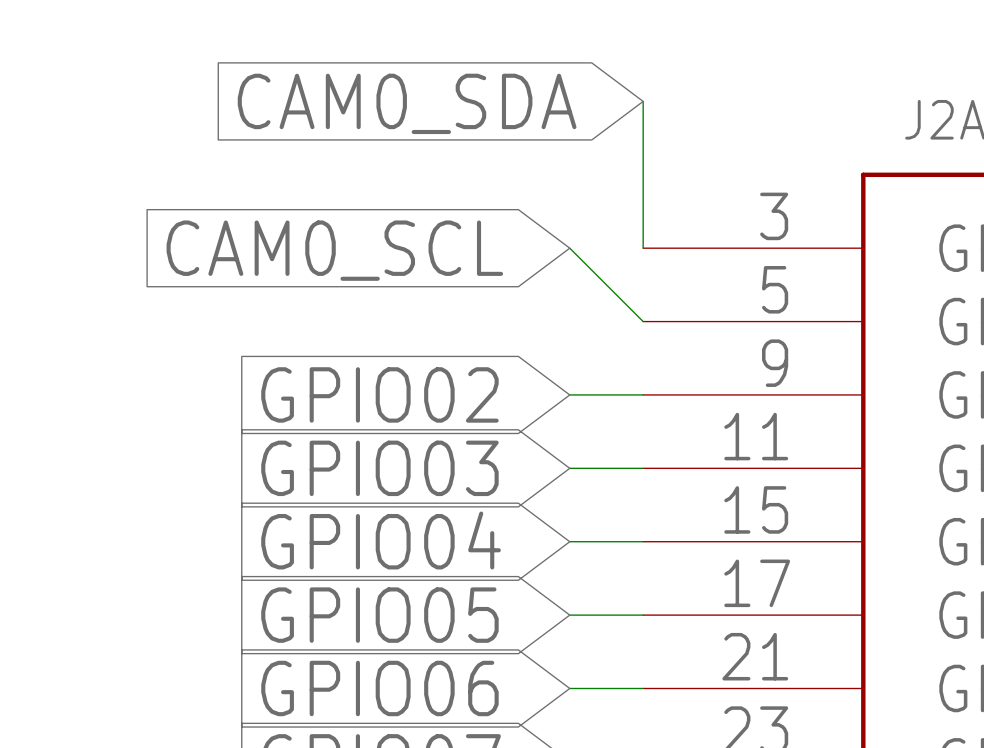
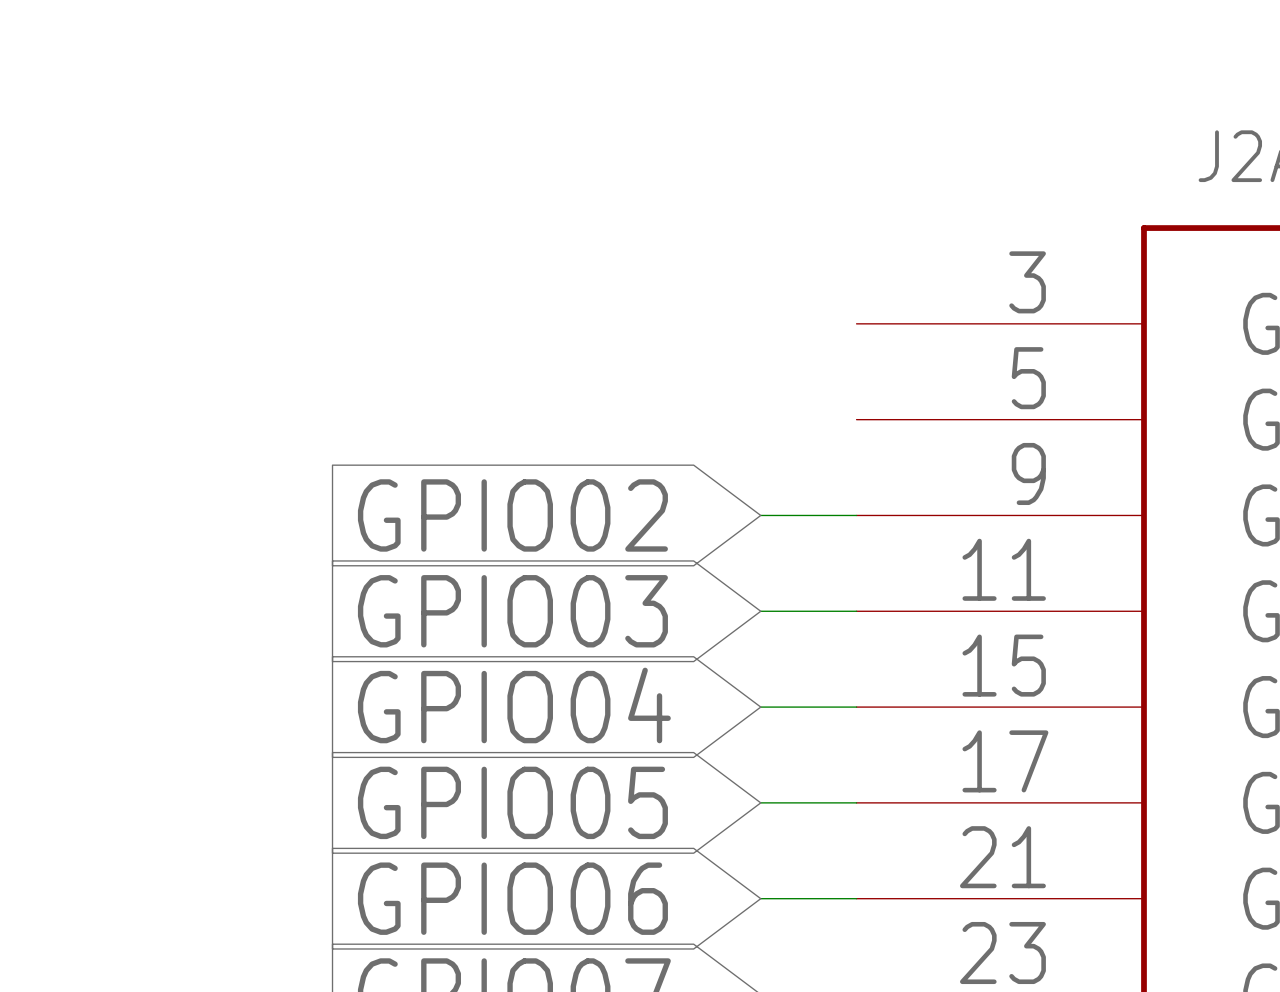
wire: (643, 101) (643, 248) -> none
global label: CAM0_SDA (407, 103) -> none
wire: (569, 248) (643, 321) -> none
global label: CAM0_SCL (334, 250) -> none

